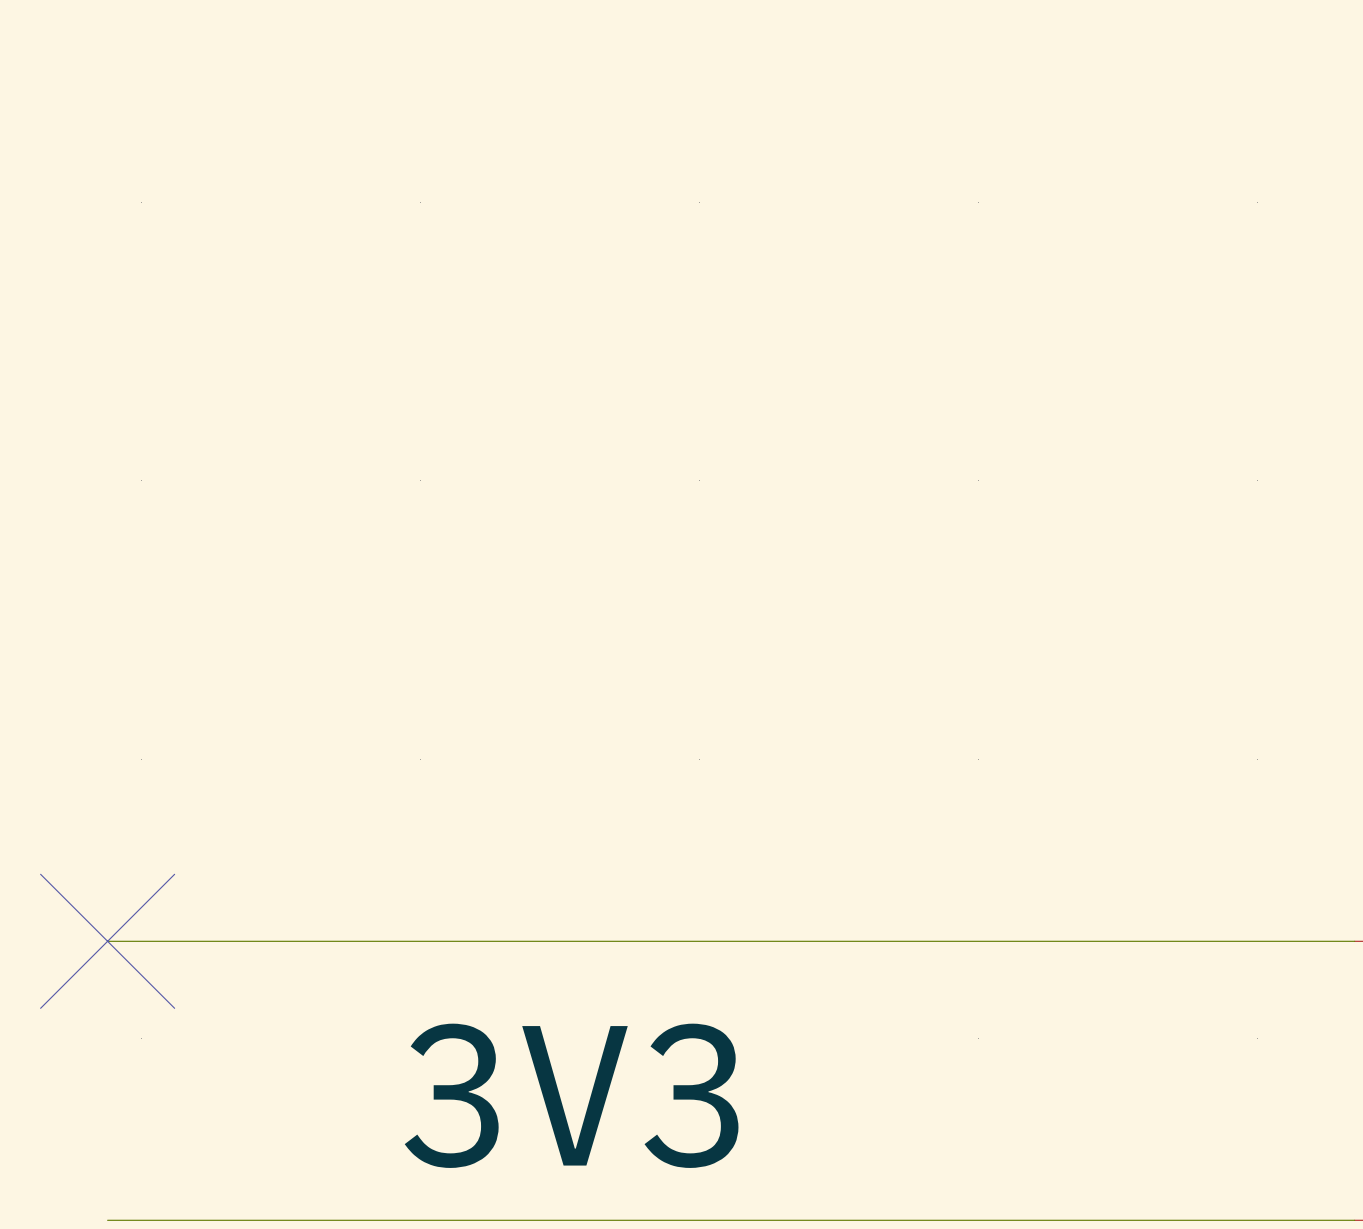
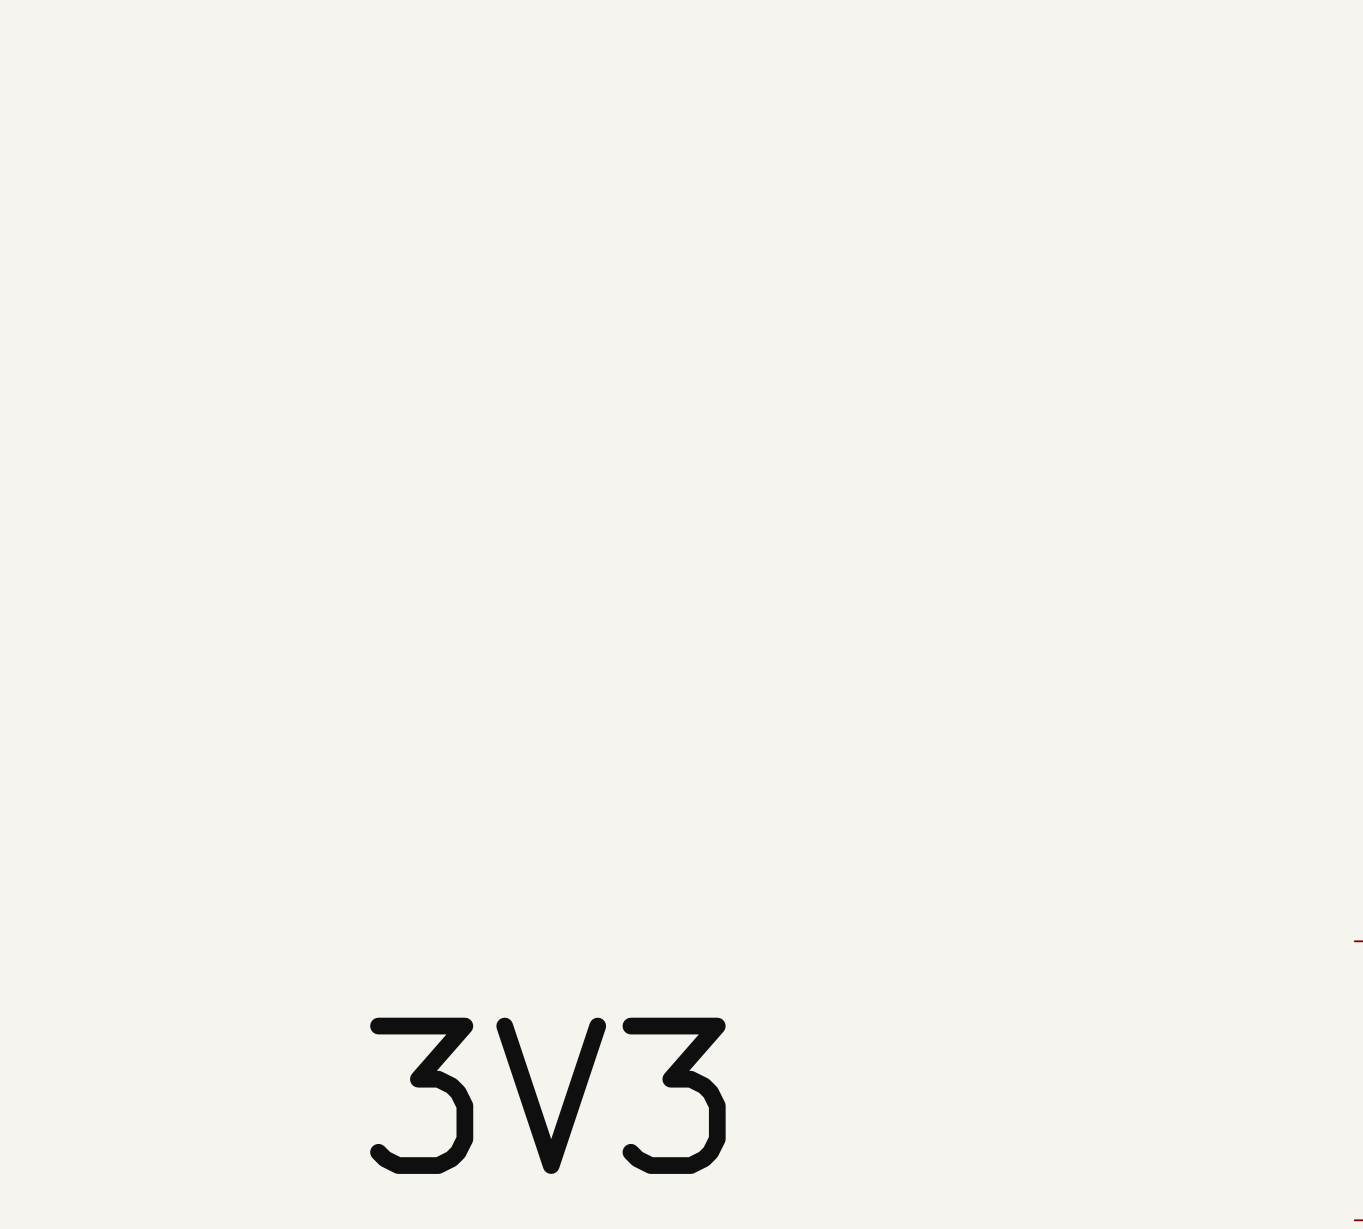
wire: (107, 941) (1354, 941) -> none
no-connect mark: (107, 941) -> none
wire: (107, 1220) (1354, 1220) -> none

